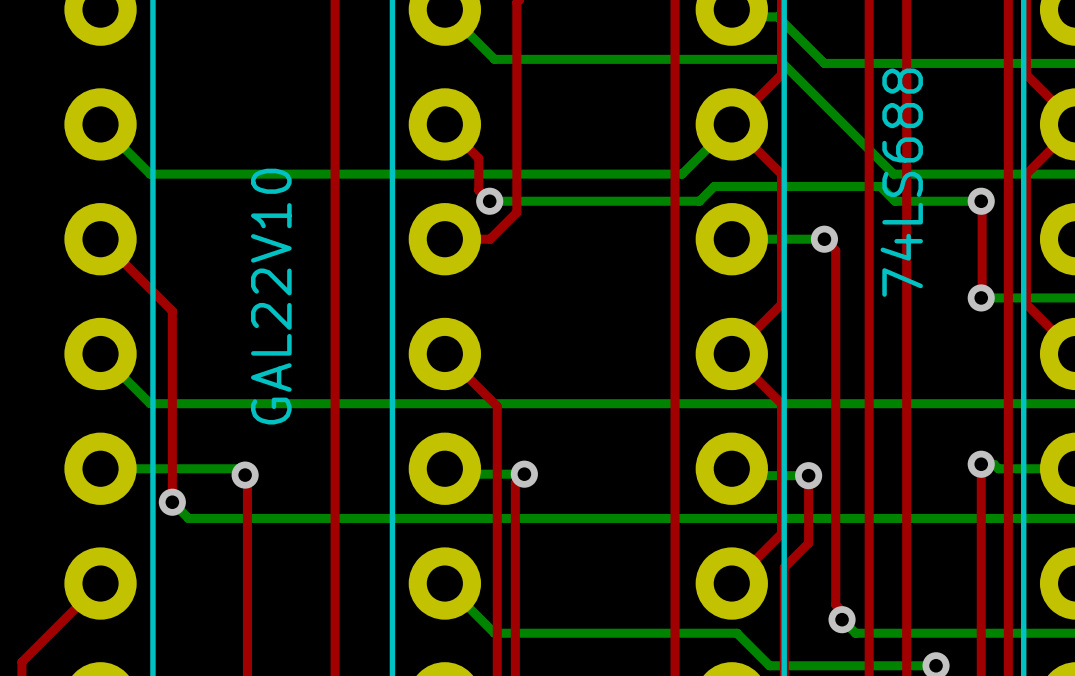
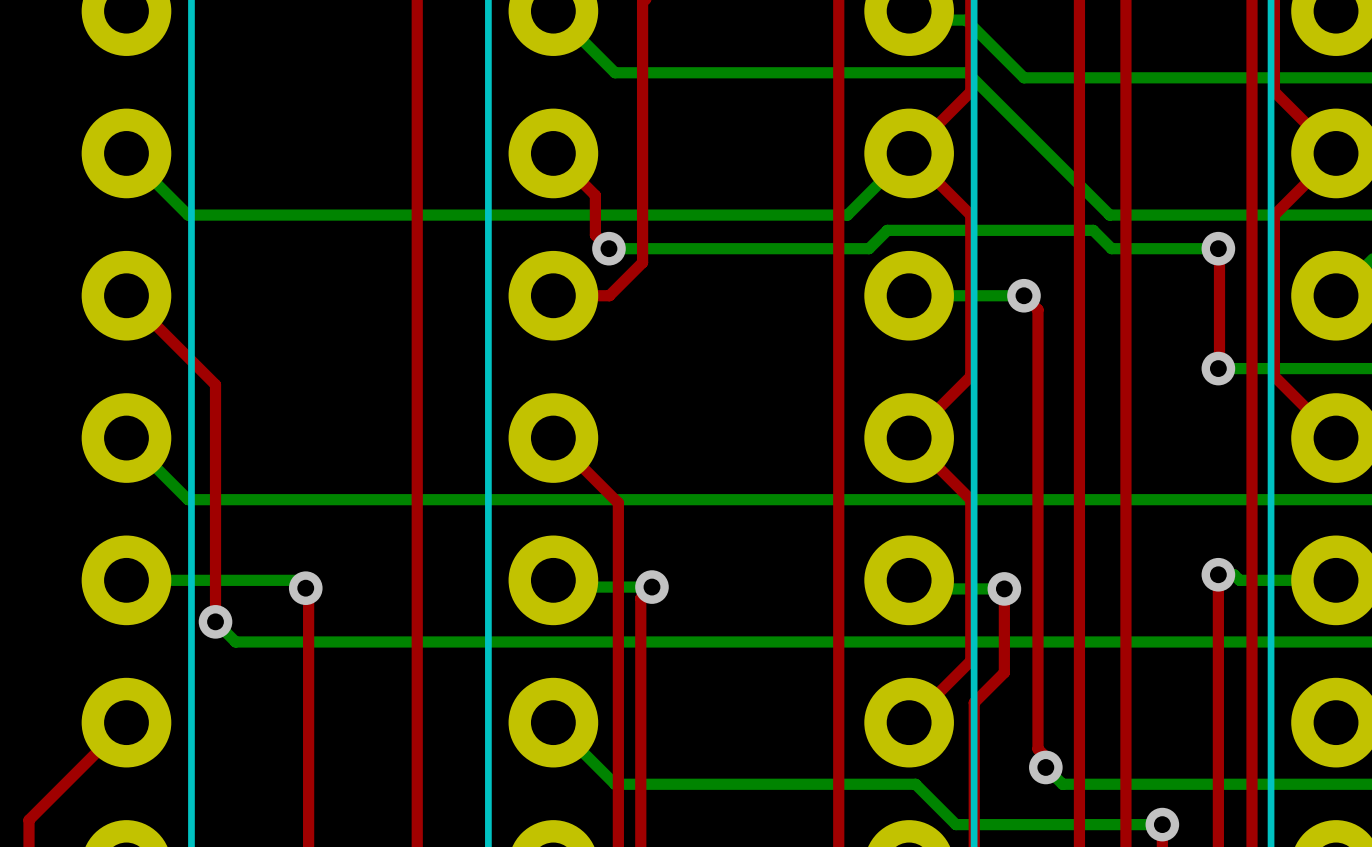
part value: 74LS688 (901, 182) -> none
part value: GAL22V10 (271, 296) -> none

